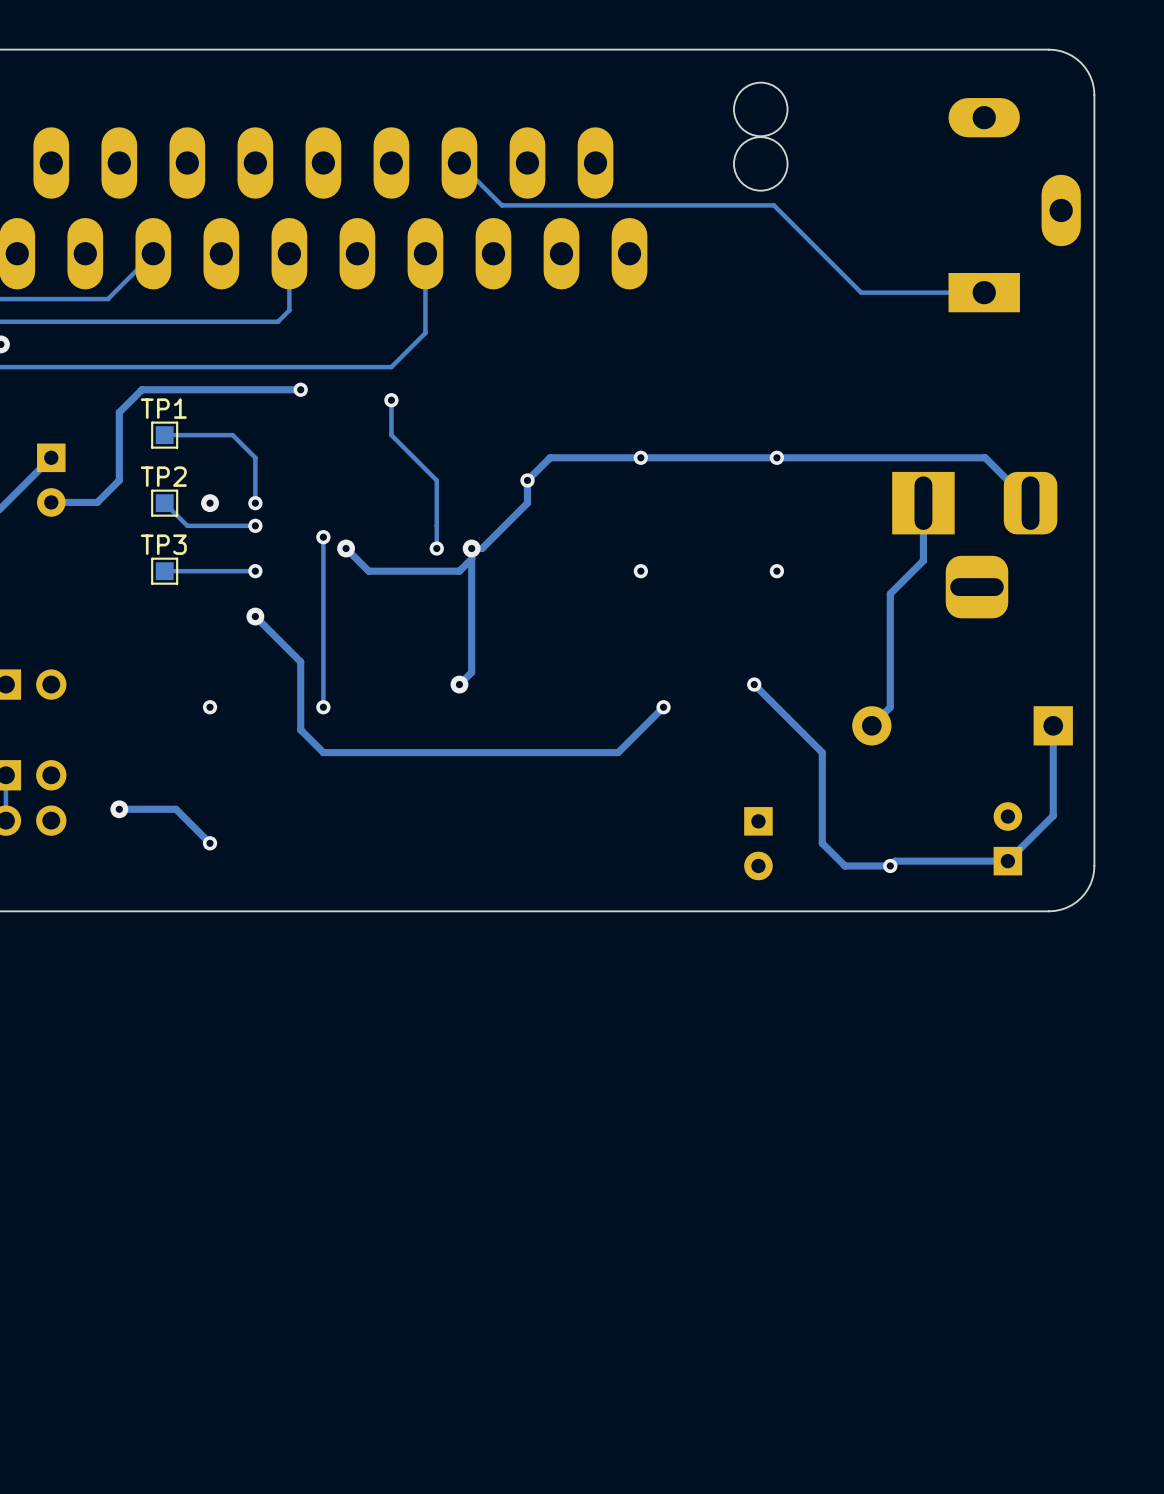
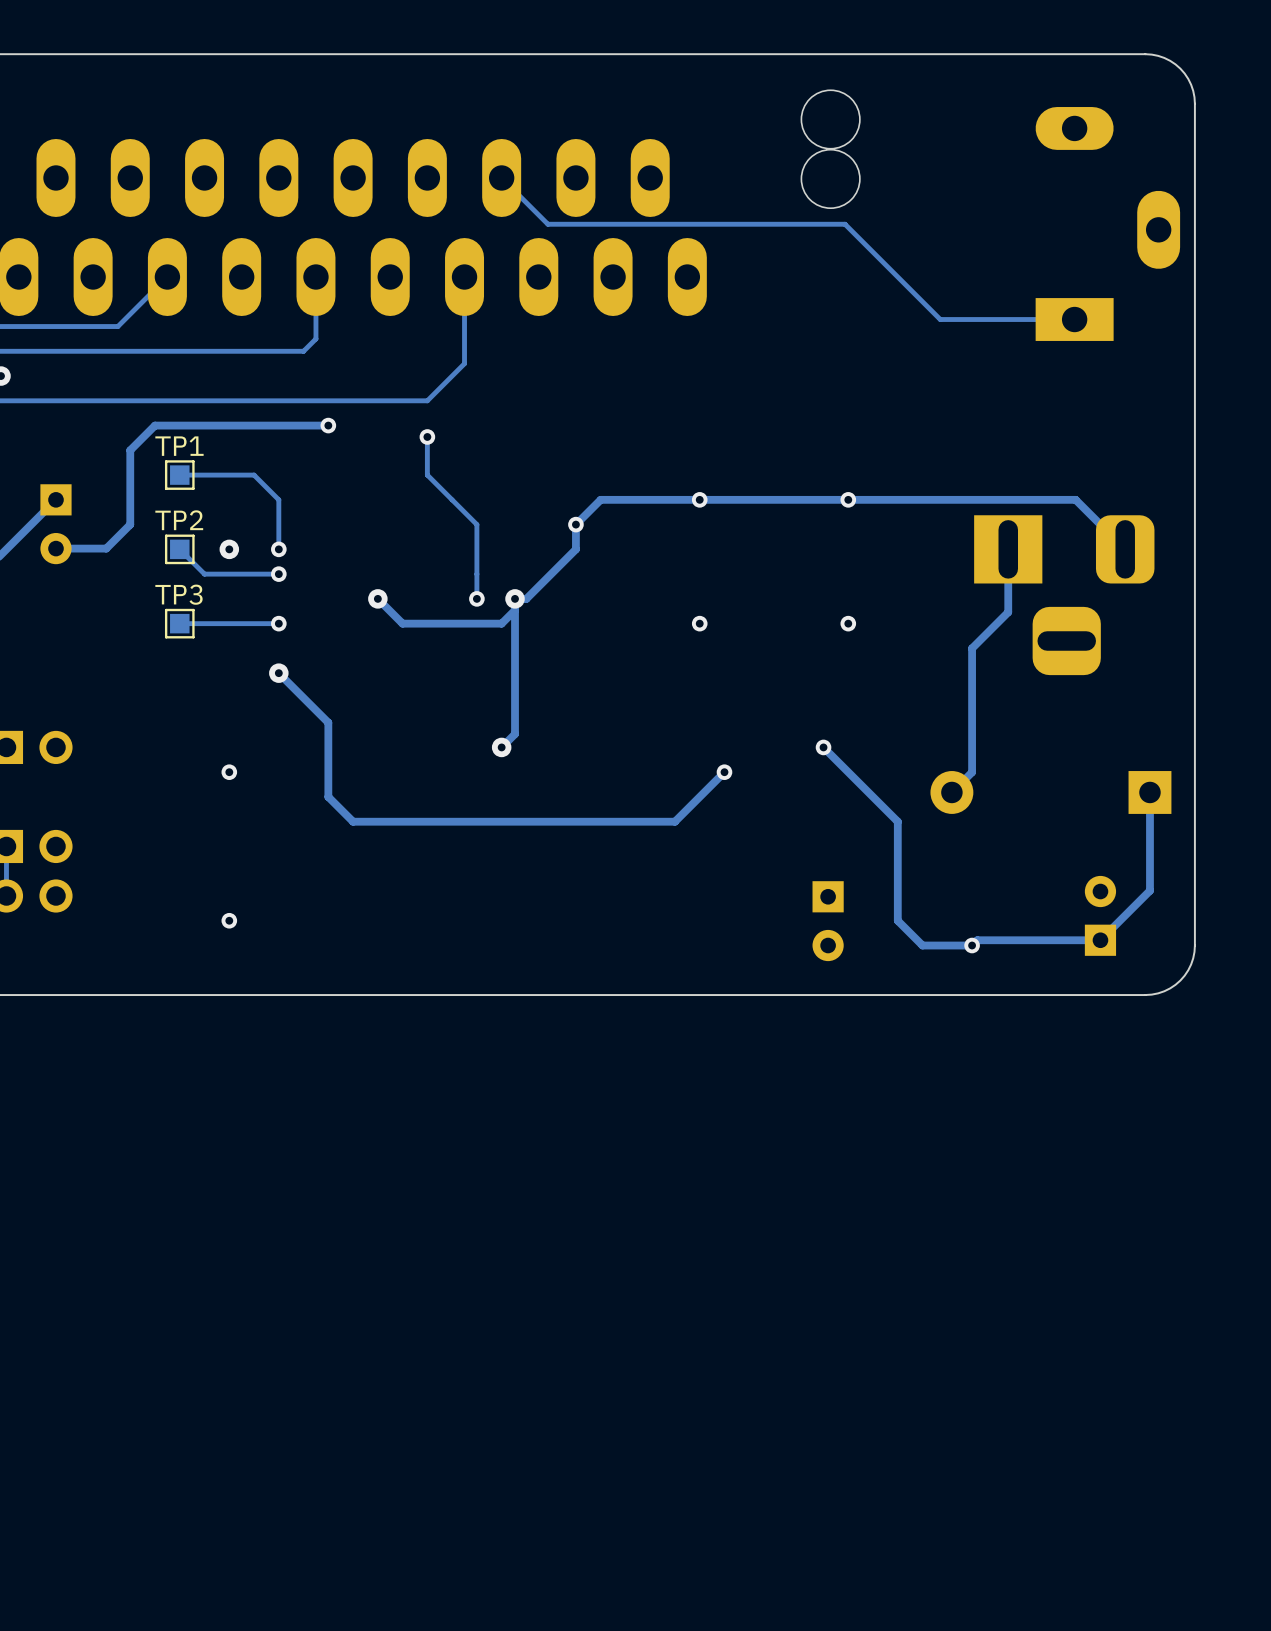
track: (323, 537) (323, 707) -> none
via: (323, 537) -> none
via: (323, 707) -> none
track: (119, 809) (176, 809) (210, 843) -> none
via: (119, 809) -> none

